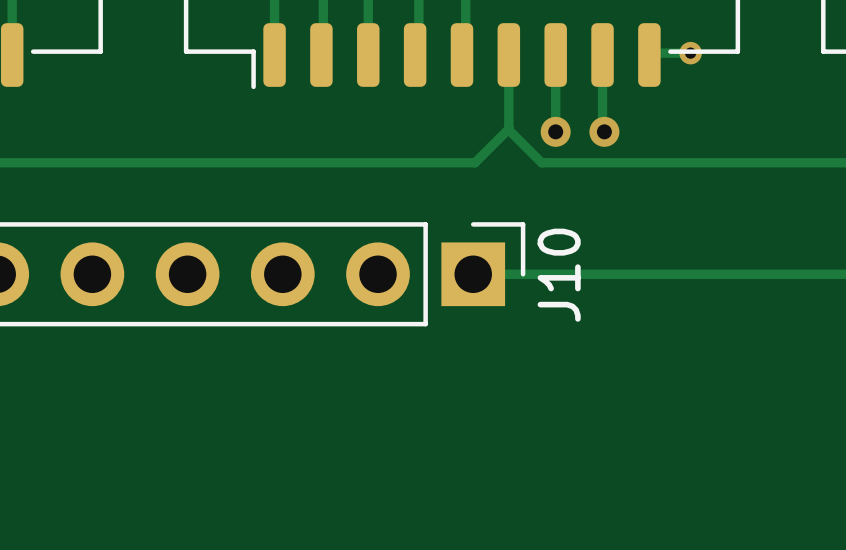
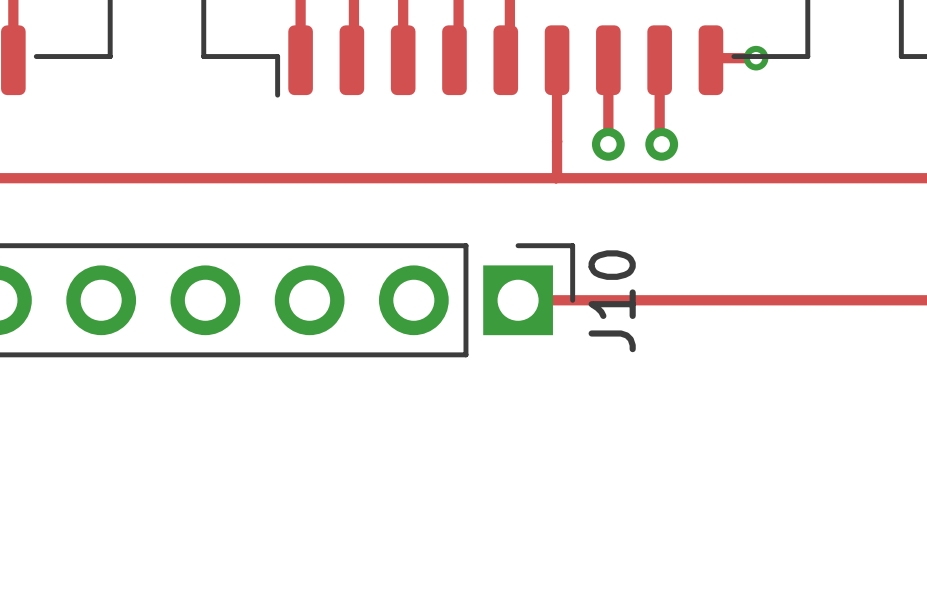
track: (508, 128) (475, 162) -> (592, 178) (520, 178)
track: (508, 129) (541, 162) -> (557, 142) (556, 178)

